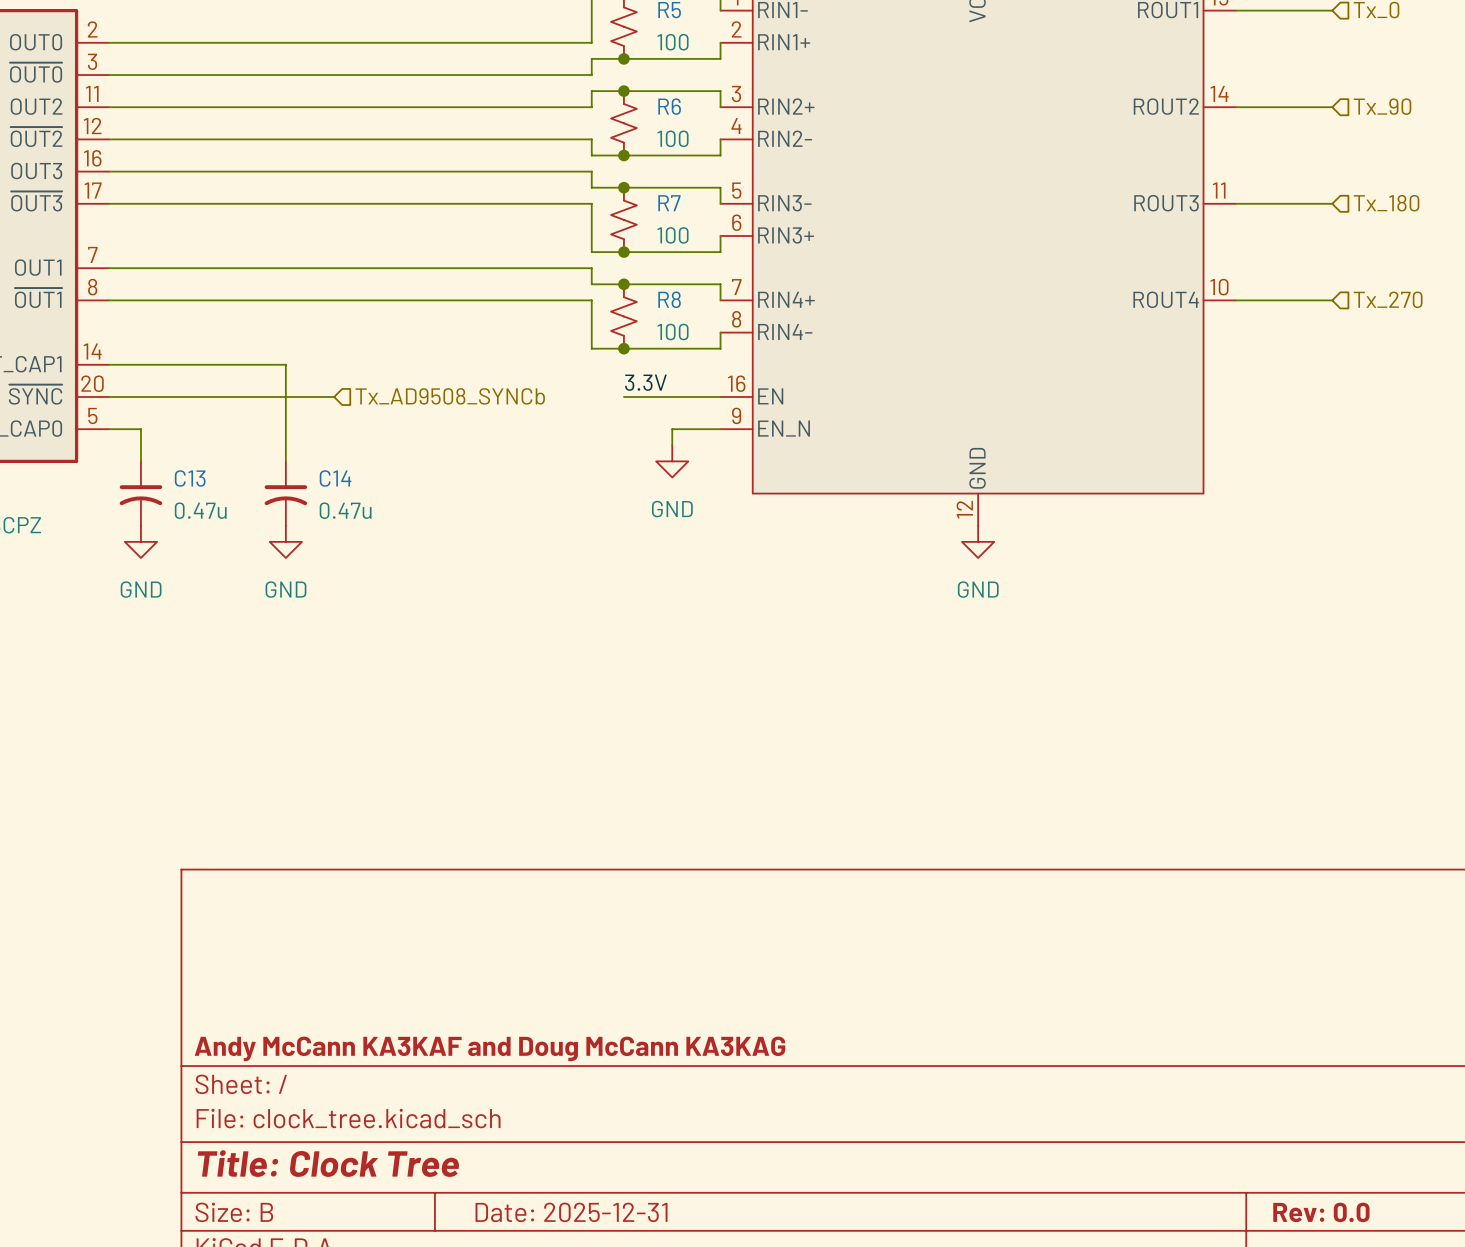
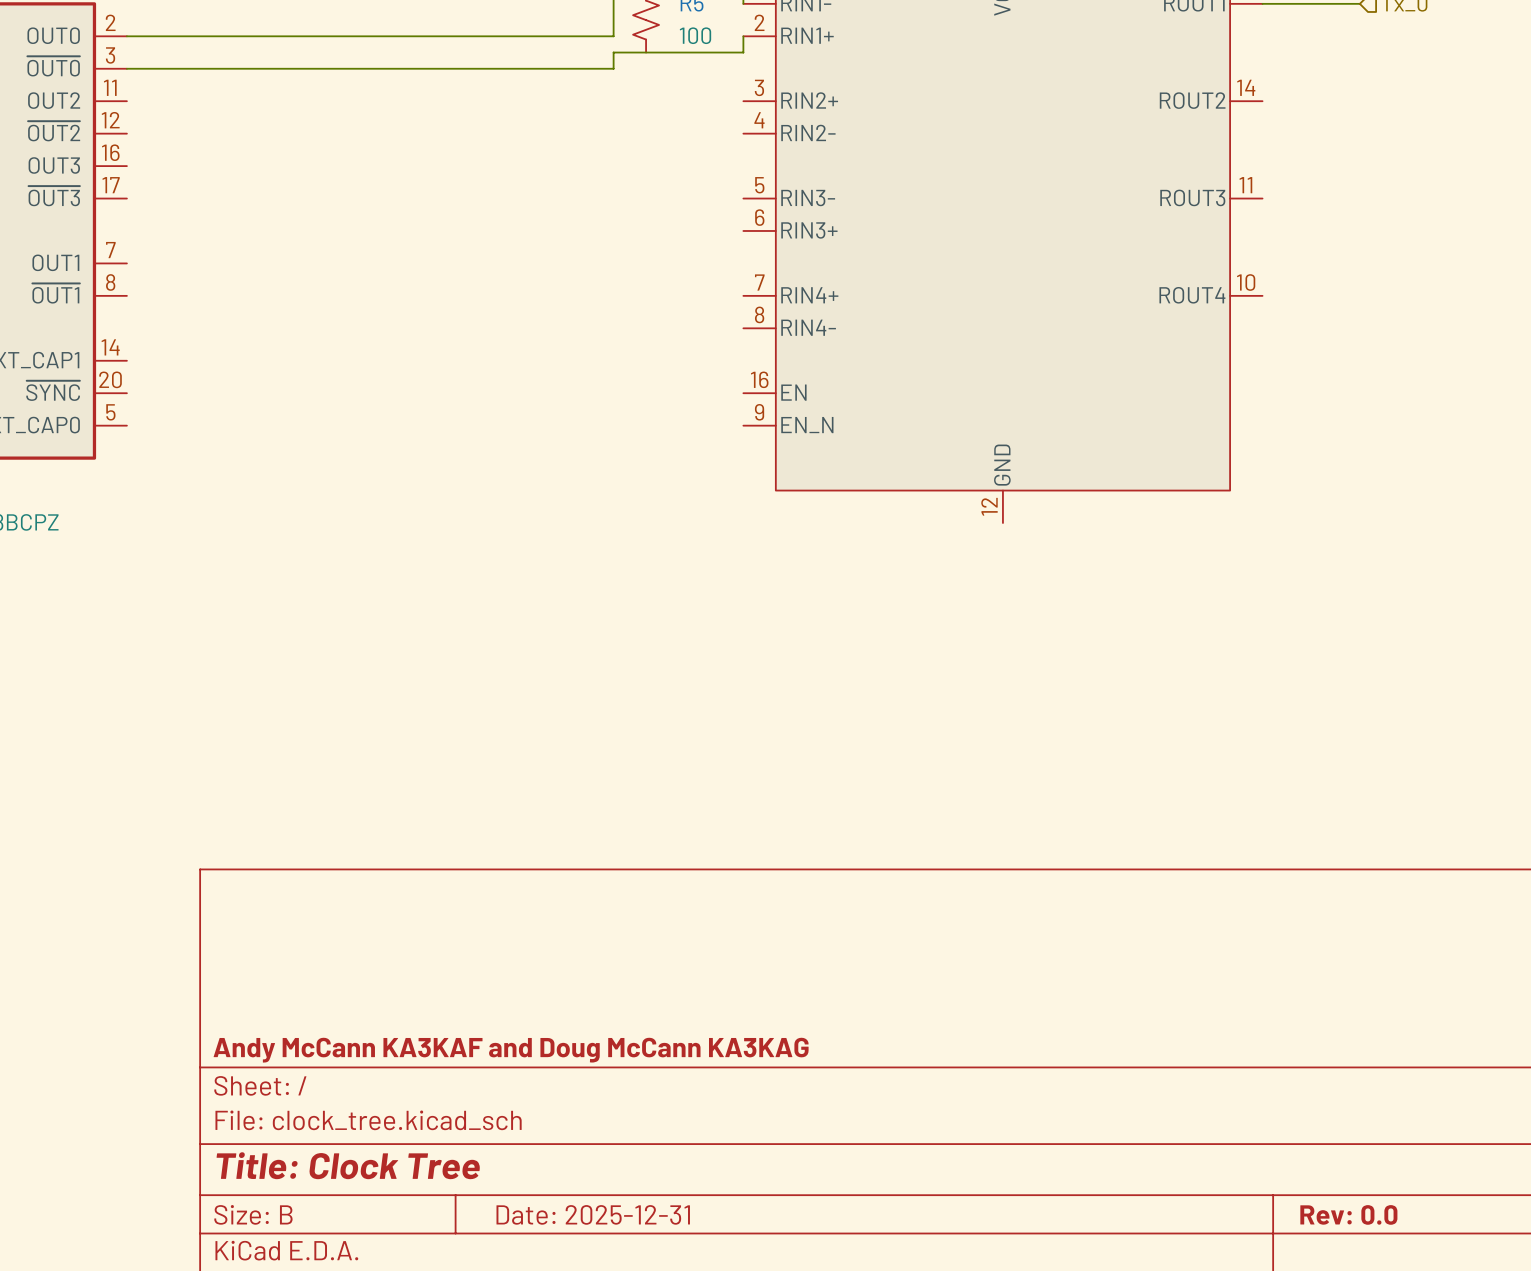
junction: (623, 58) -> none
junction: (623, 91) -> none
hierarchical label: Tx_90 (1382, 106) -> none
wire: (108, 107) (591, 107) (591, 91) (720, 91) (720, 107) -> none
wire: (1235, 107) (1332, 107) -> none
R6: 100 (623, 123) -> none
wire: (108, 139) (591, 139) (591, 155) (720, 155) (720, 139) -> none
junction: (623, 155) -> none
wire: (108, 171) (591, 171) (591, 187) (720, 187) (720, 203) -> none
junction: (623, 187) -> none
wire: (108, 203) (591, 203) (591, 252) (720, 252) (720, 236) -> none
wire: (1235, 203) (1332, 203) -> none
hierarchical label: Tx_180 (1386, 203) -> none
R7: 100 (623, 219) -> none
junction: (623, 252) -> none
wire: (108, 268) (591, 268) (591, 284) (720, 284) (720, 300) -> none
junction: (623, 284) -> none
hierarchical label: Tx_270 (1388, 299) -> none
wire: (108, 300) (591, 300) (591, 348) (720, 348) (720, 332) -> none
wire: (1235, 300) (1332, 300) -> none
R8: 100 (623, 316) -> none
junction: (623, 348) -> none
wire: (108, 364) (285, 364) (285, 461) -> none
label: 3.3V (645, 382) -> none
wire: (108, 396) (334, 396) -> none
hierarchical label: Tx_AD9508_SYNCb (450, 396) -> none
wire: (623, 396) (720, 396) -> none
wire: (108, 429) (140, 429) (140, 461) -> none
wire: (720, 429) (672, 429) (672, 445) -> none
power symbol: GND (672, 461) -> none
C13: 0.47u (140, 493) -> none
C14: 0.47u (285, 493) -> none
power symbol: GND (140, 541) -> none
power symbol: GND (285, 541) -> none
power symbol: GND (978, 541) -> none

